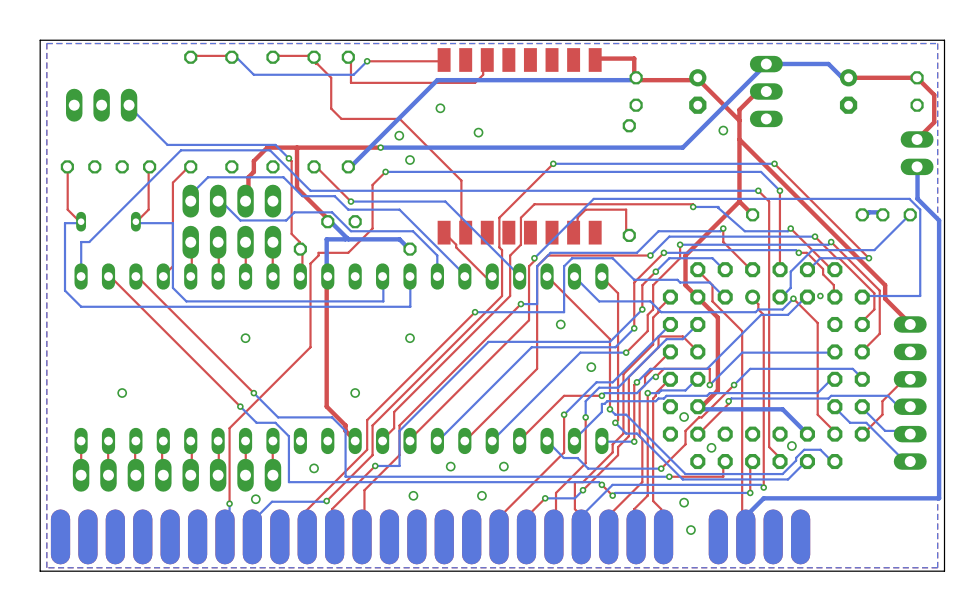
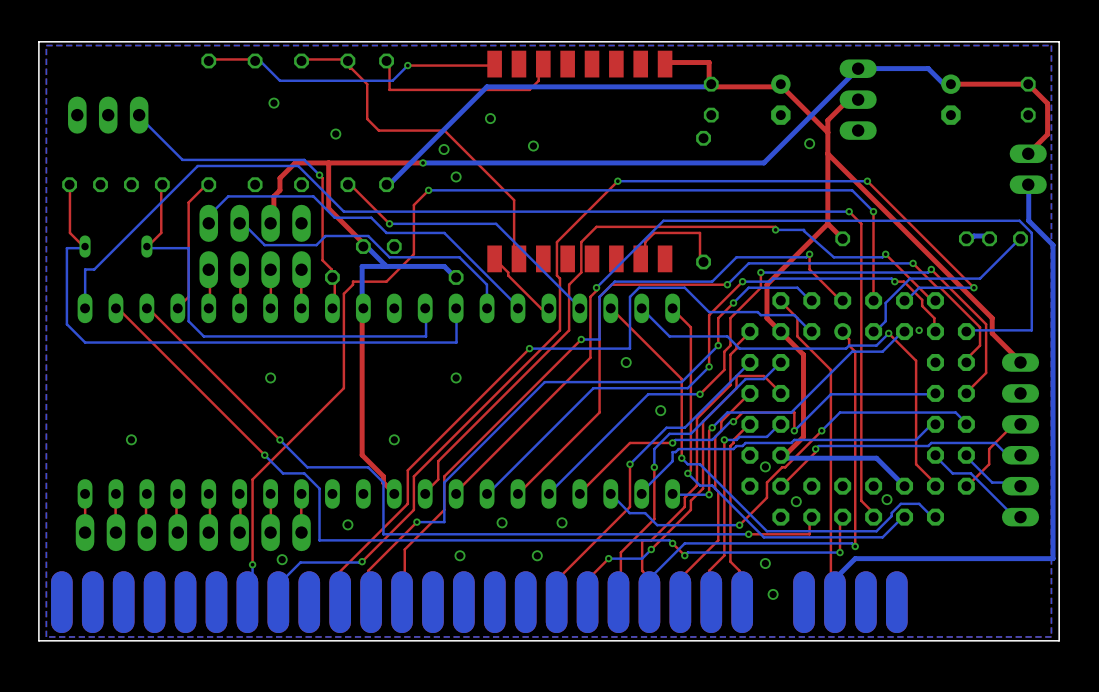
via: none -> (273, 103)
via: none -> (335, 134)

